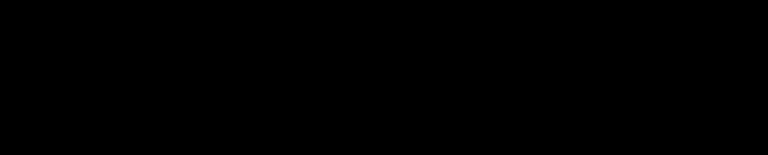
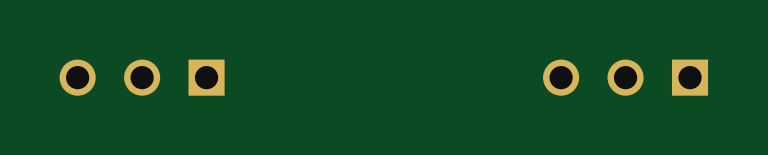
part: none -> (142, 77)
part: none -> (625, 77)

